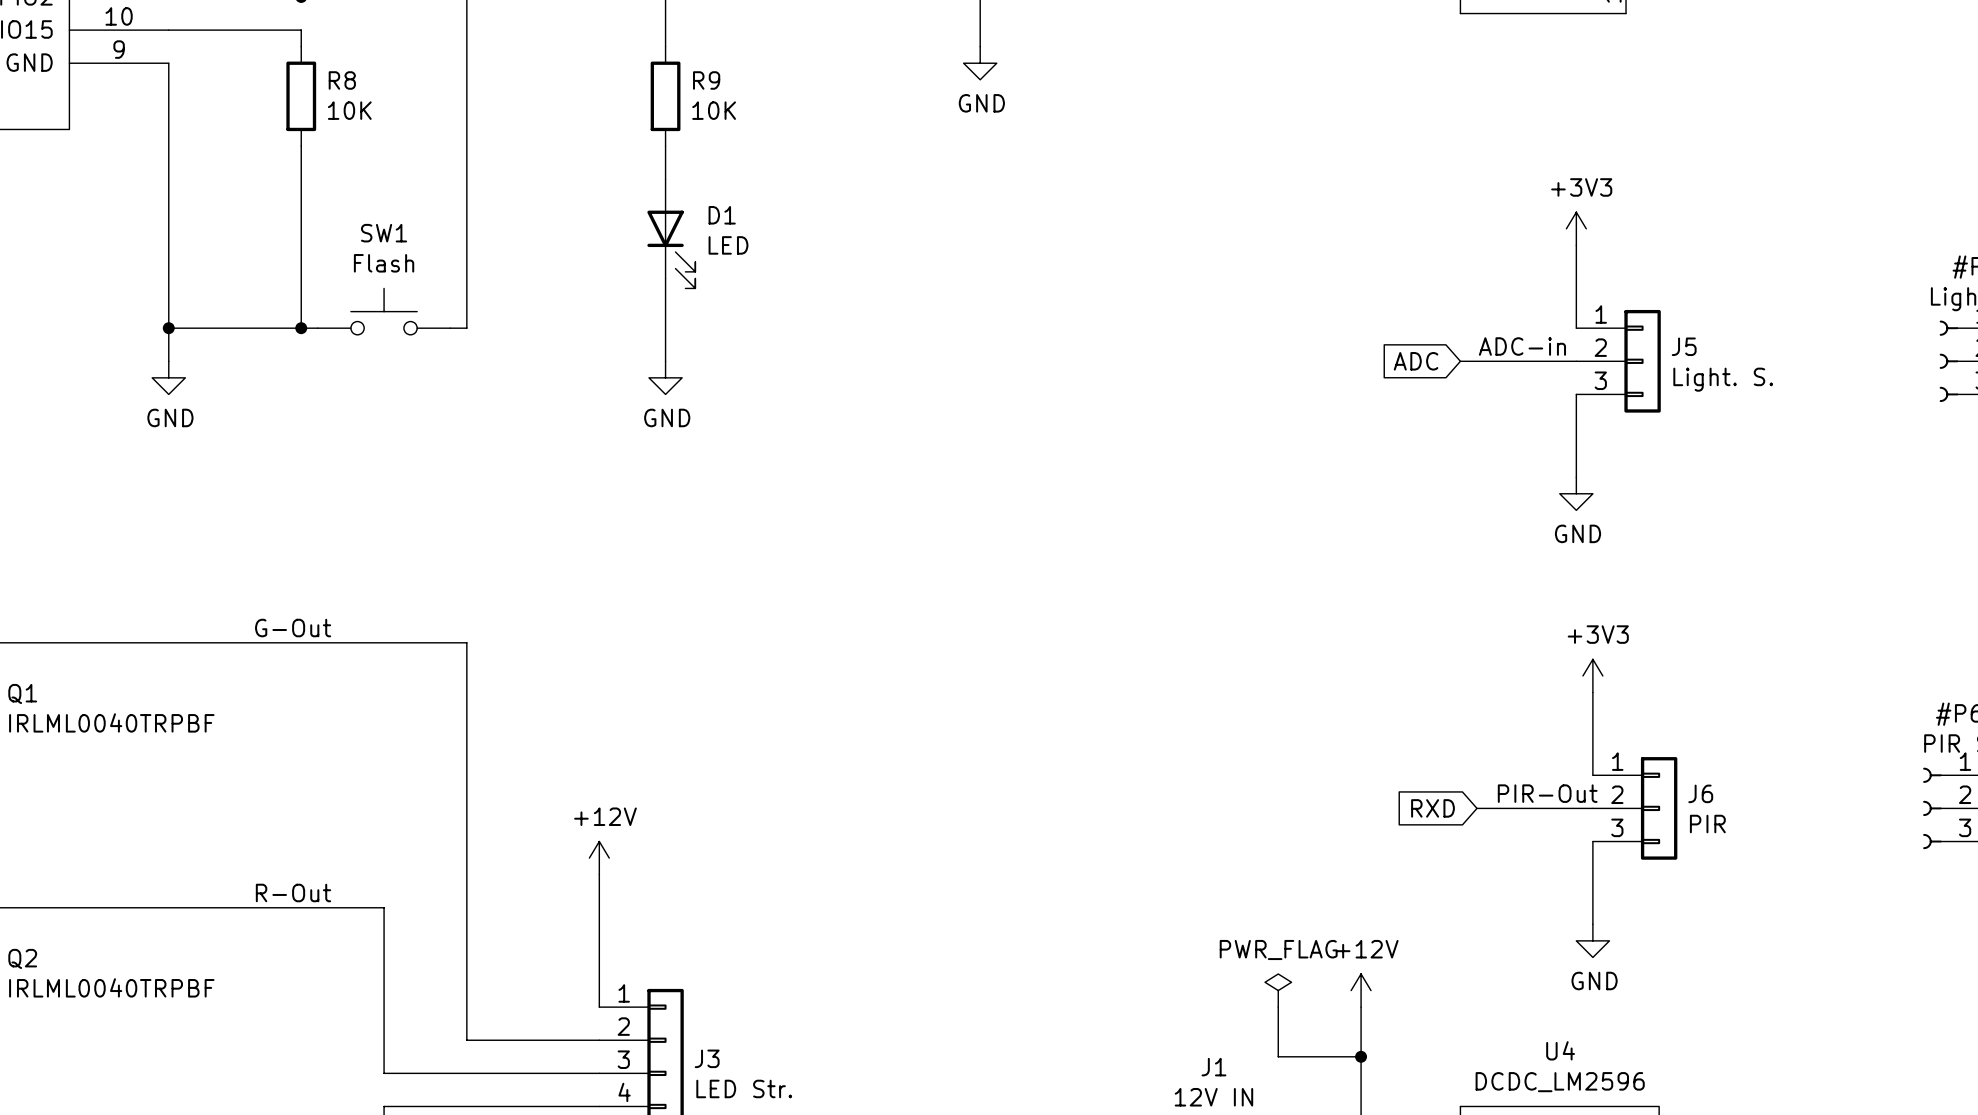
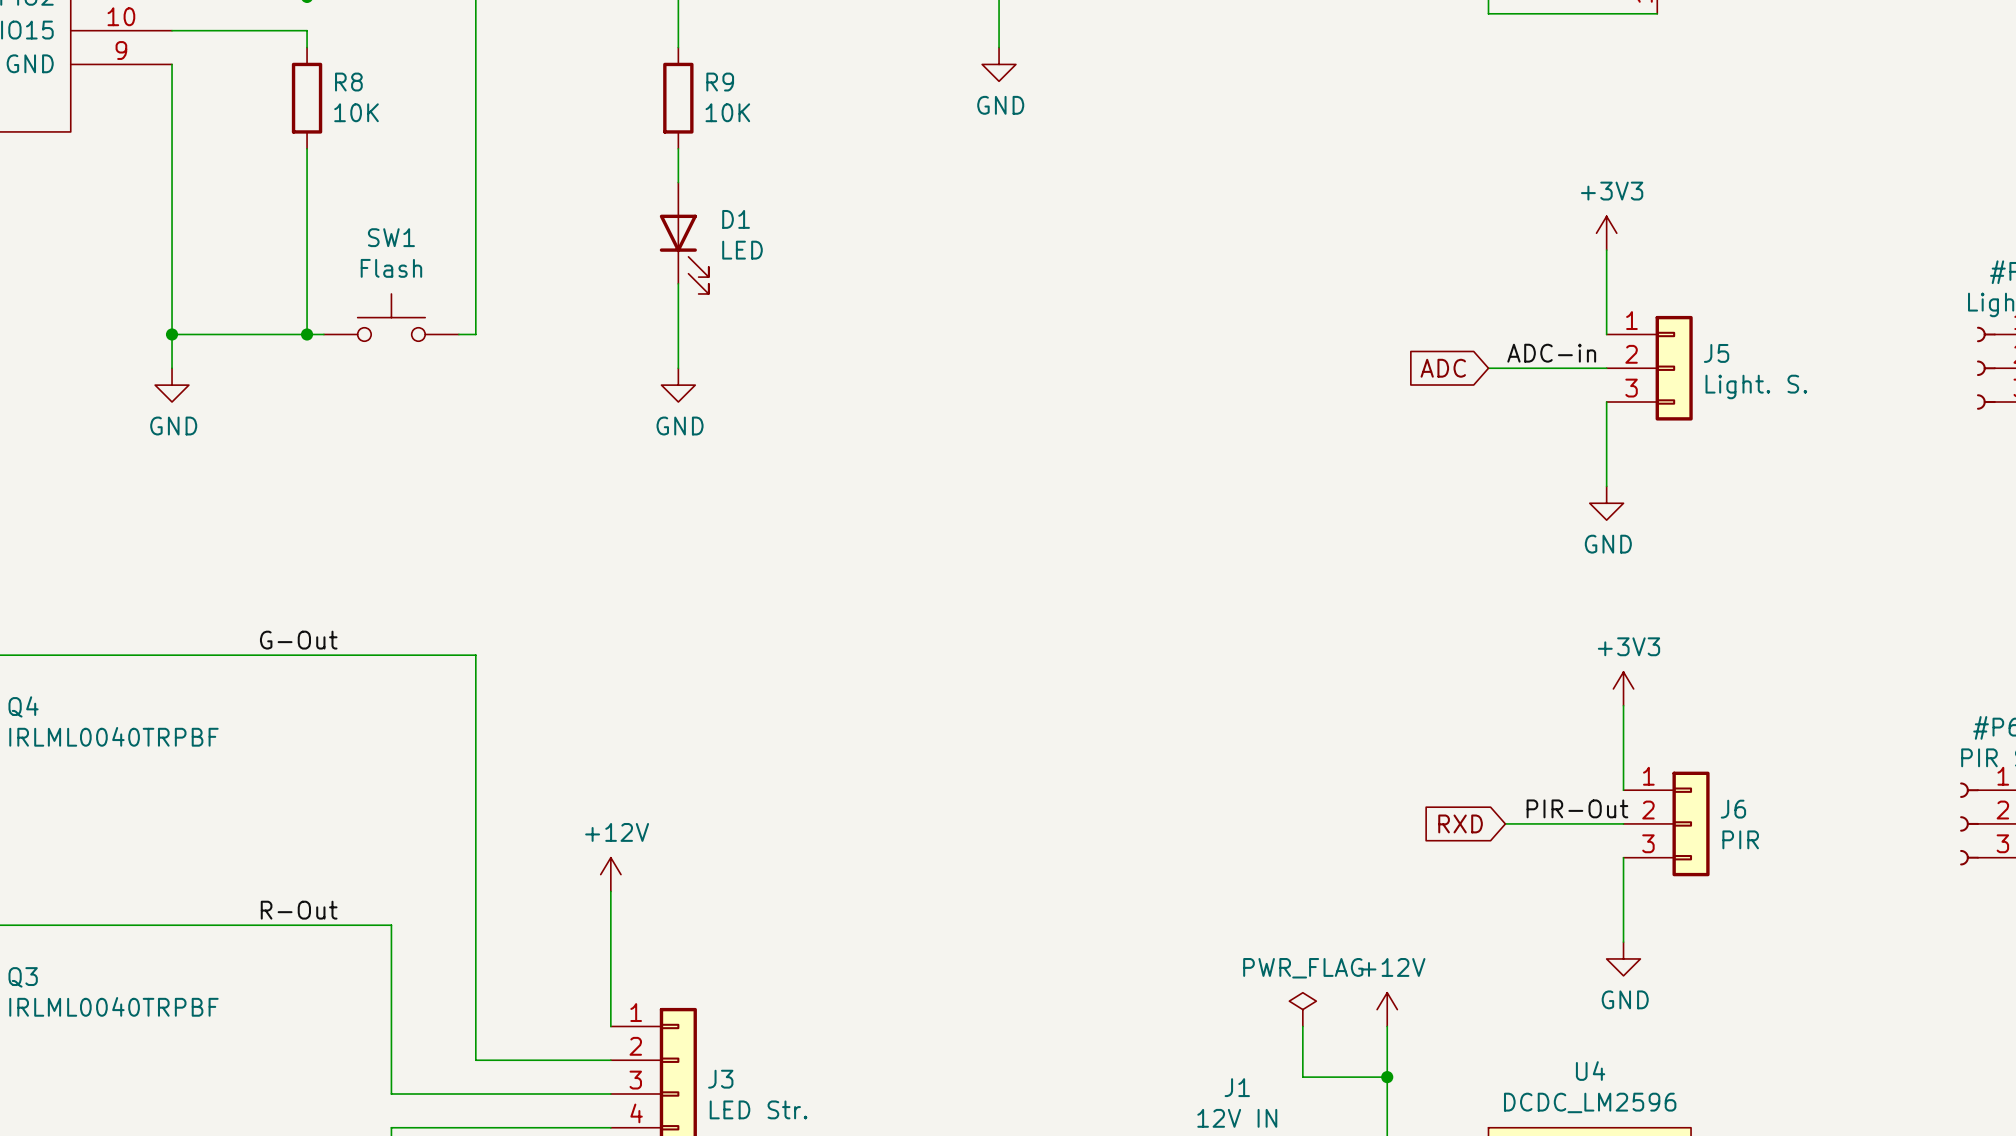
Q1 name: Q1 (22, 693) -> Q4 (23, 706)
Q2 name: Q2 (22, 958) -> Q3 (23, 977)

